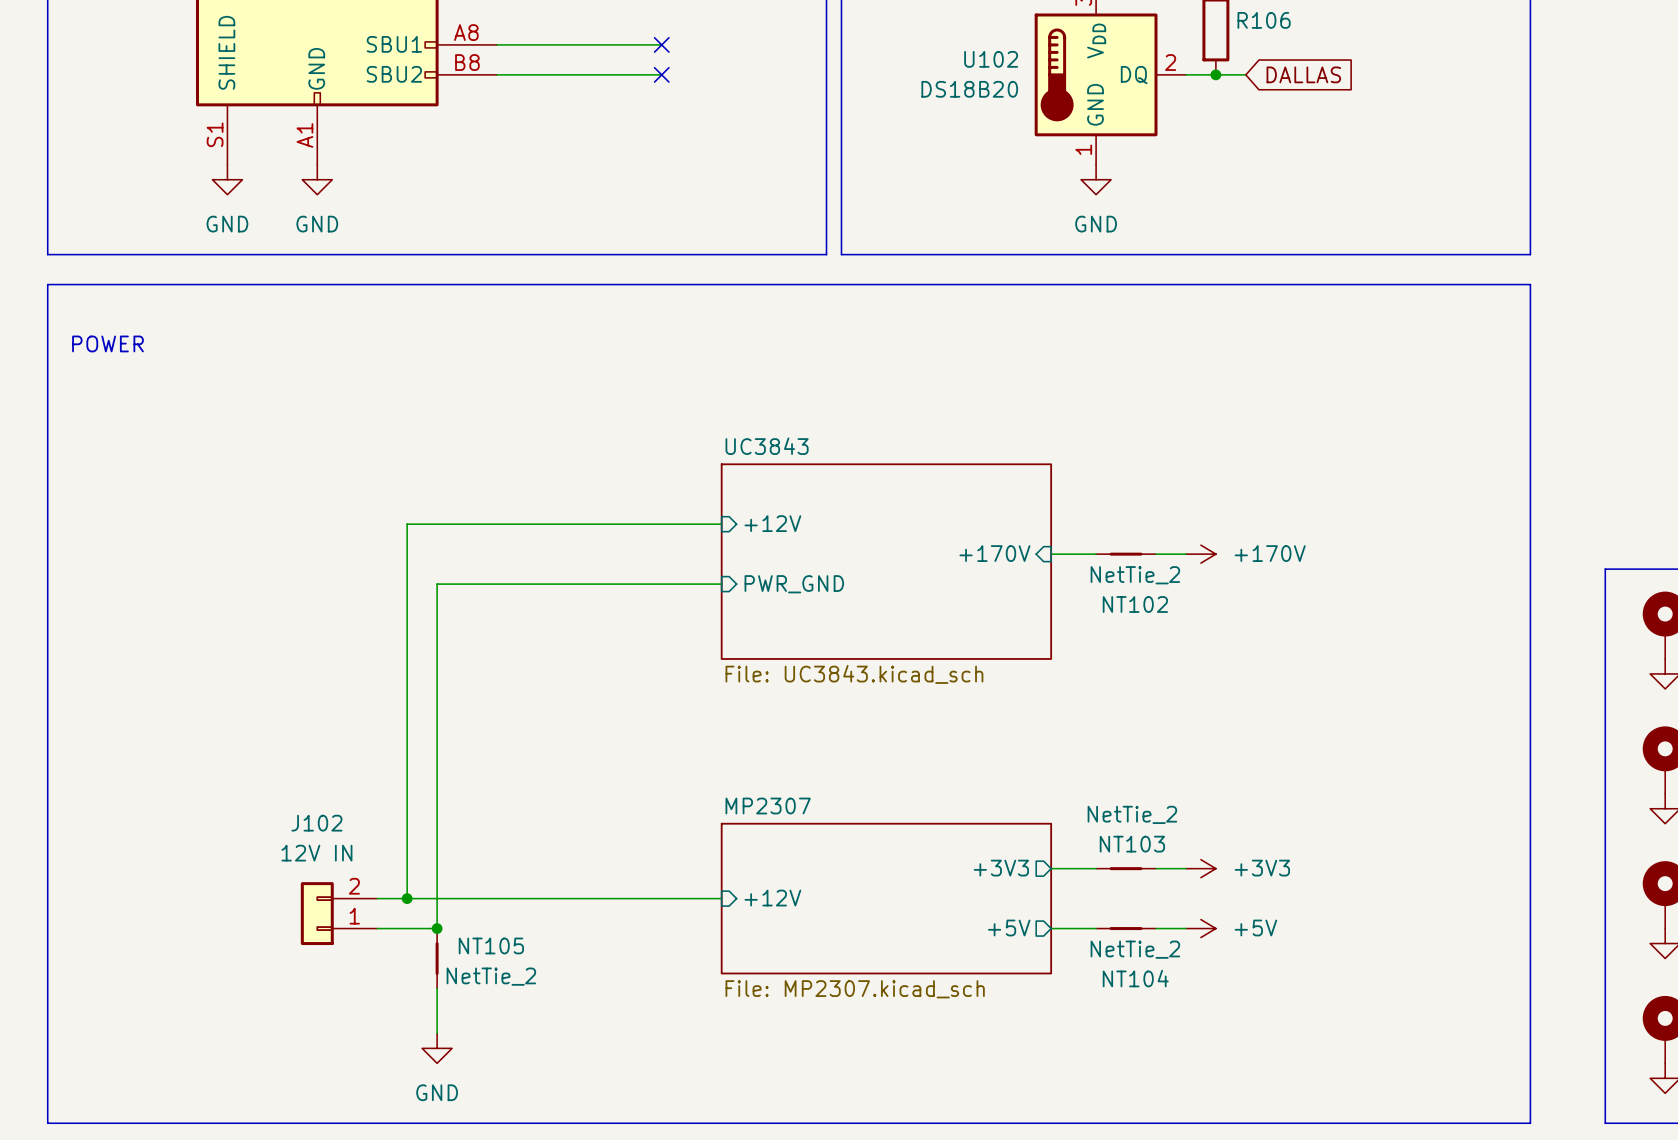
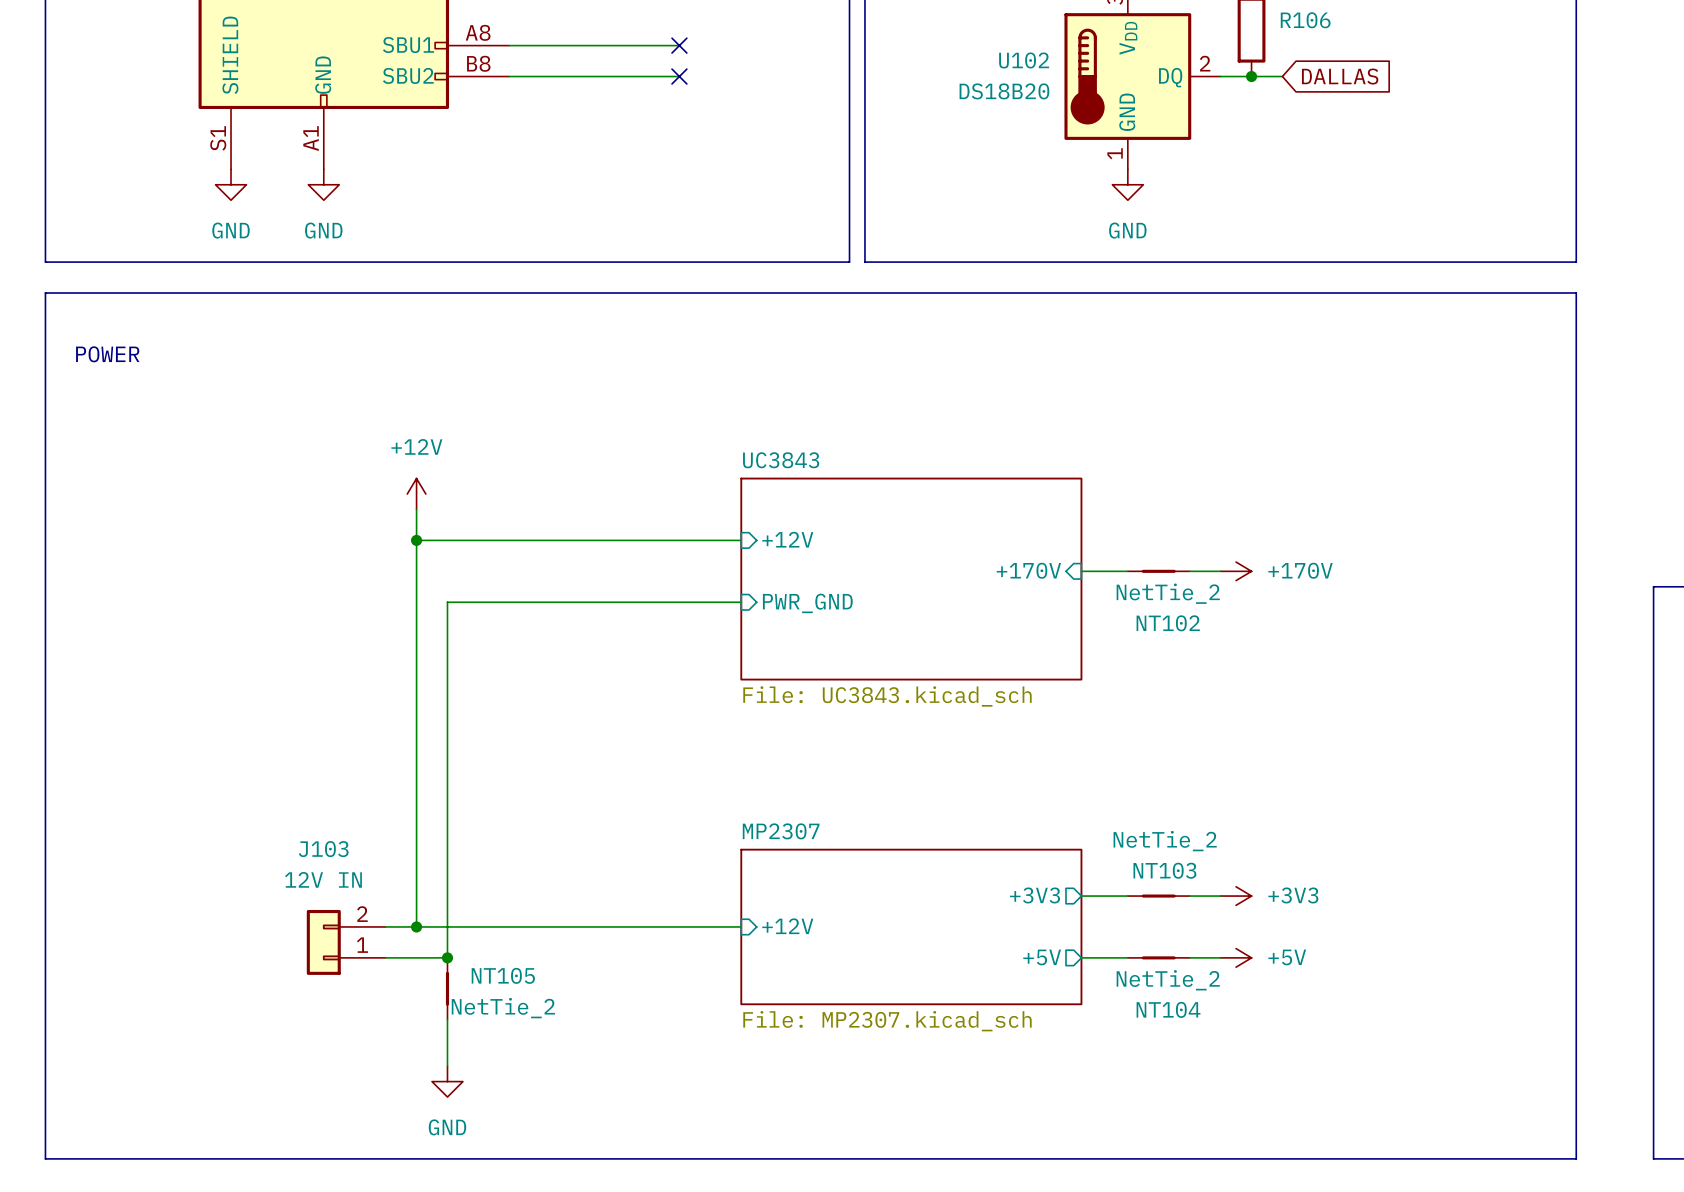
power symbol: none -> +12V (416, 494)
wire: none -> (416, 509) (416, 540)
junction: none -> (416, 540)
J102 name: J102 (316, 823) -> J103 (323, 849)

